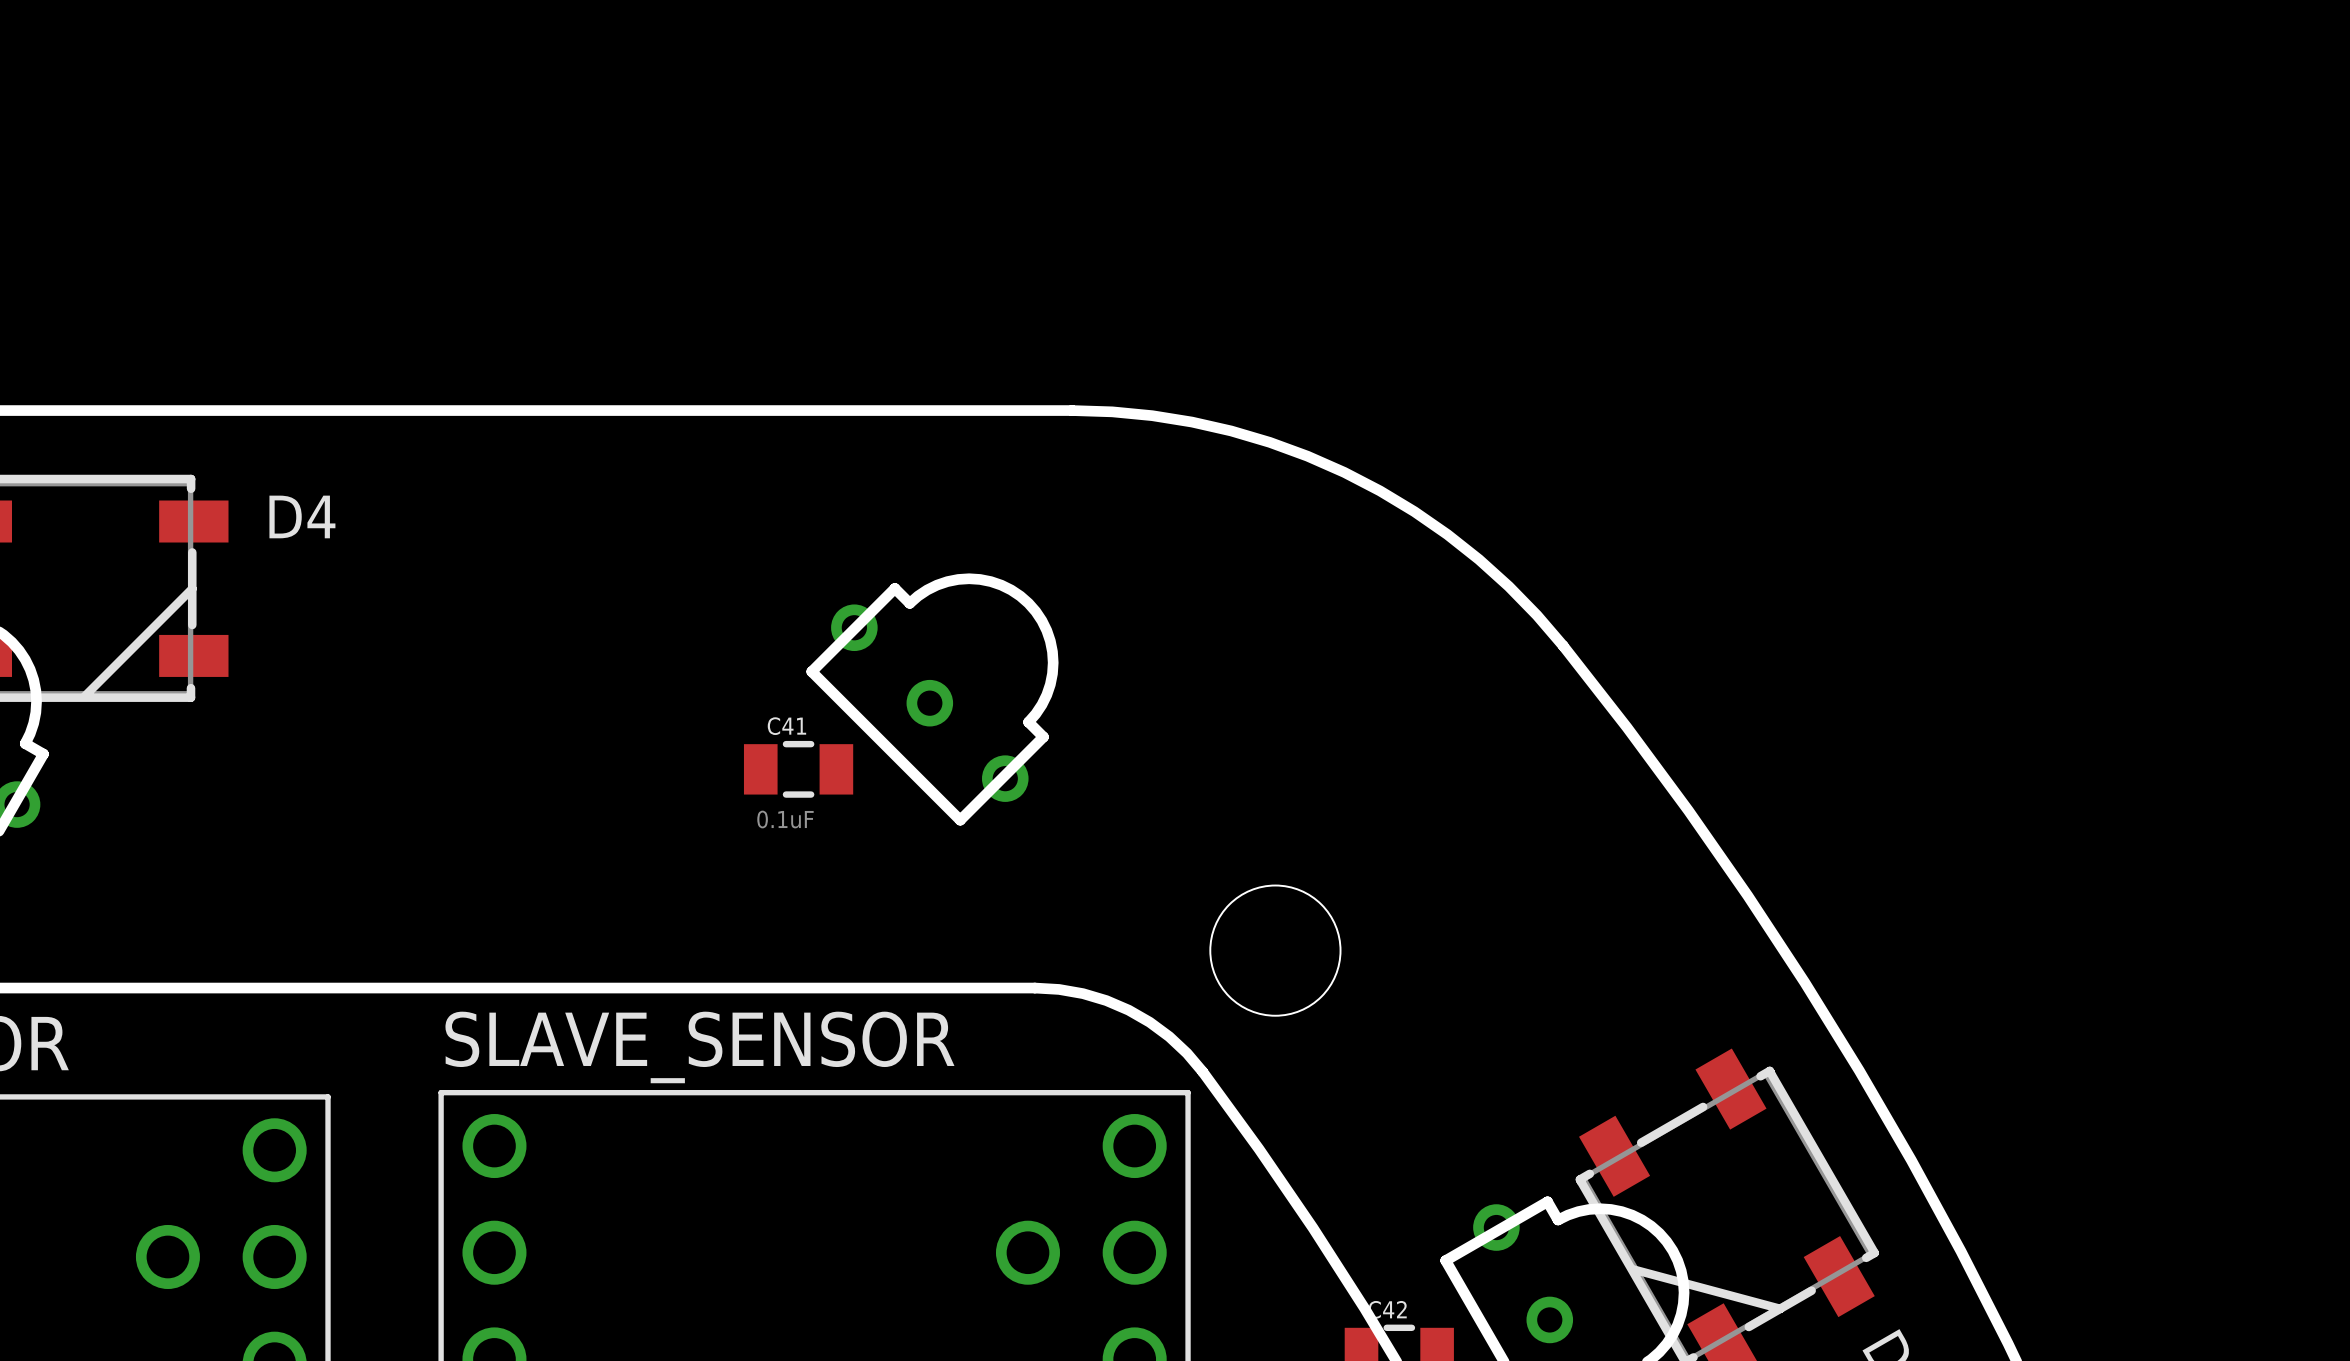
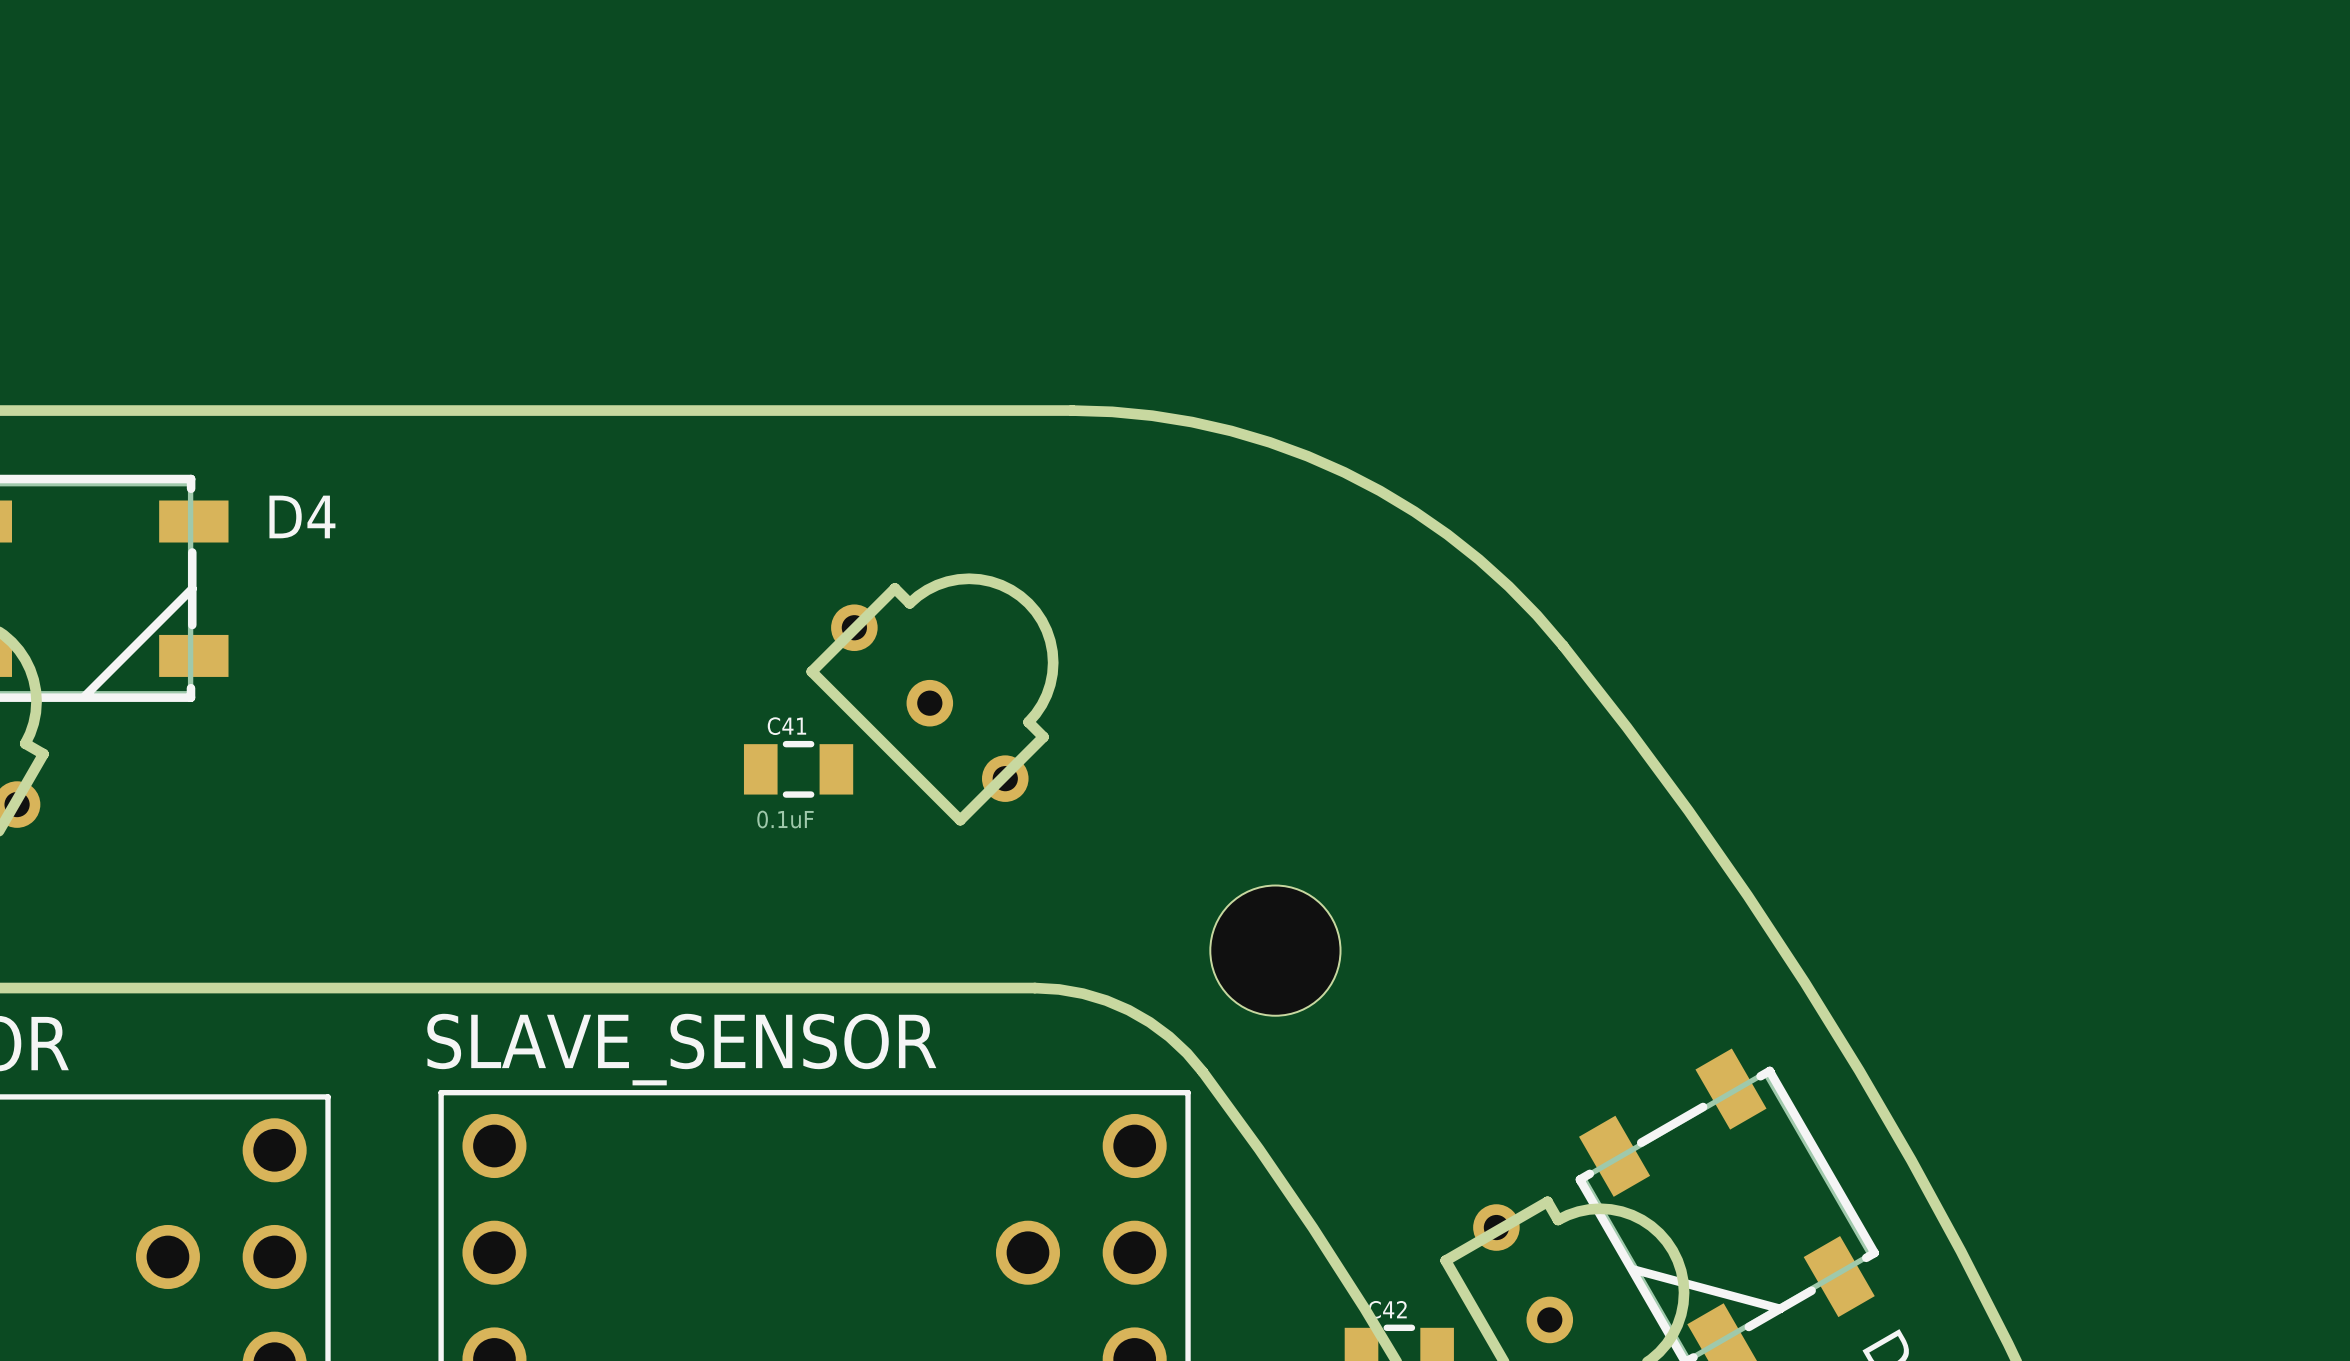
SLAVE_SENSOR name position: SLAVE_SENSOR (699, 1047) -> SLAVE_SENSOR (681, 1049)

